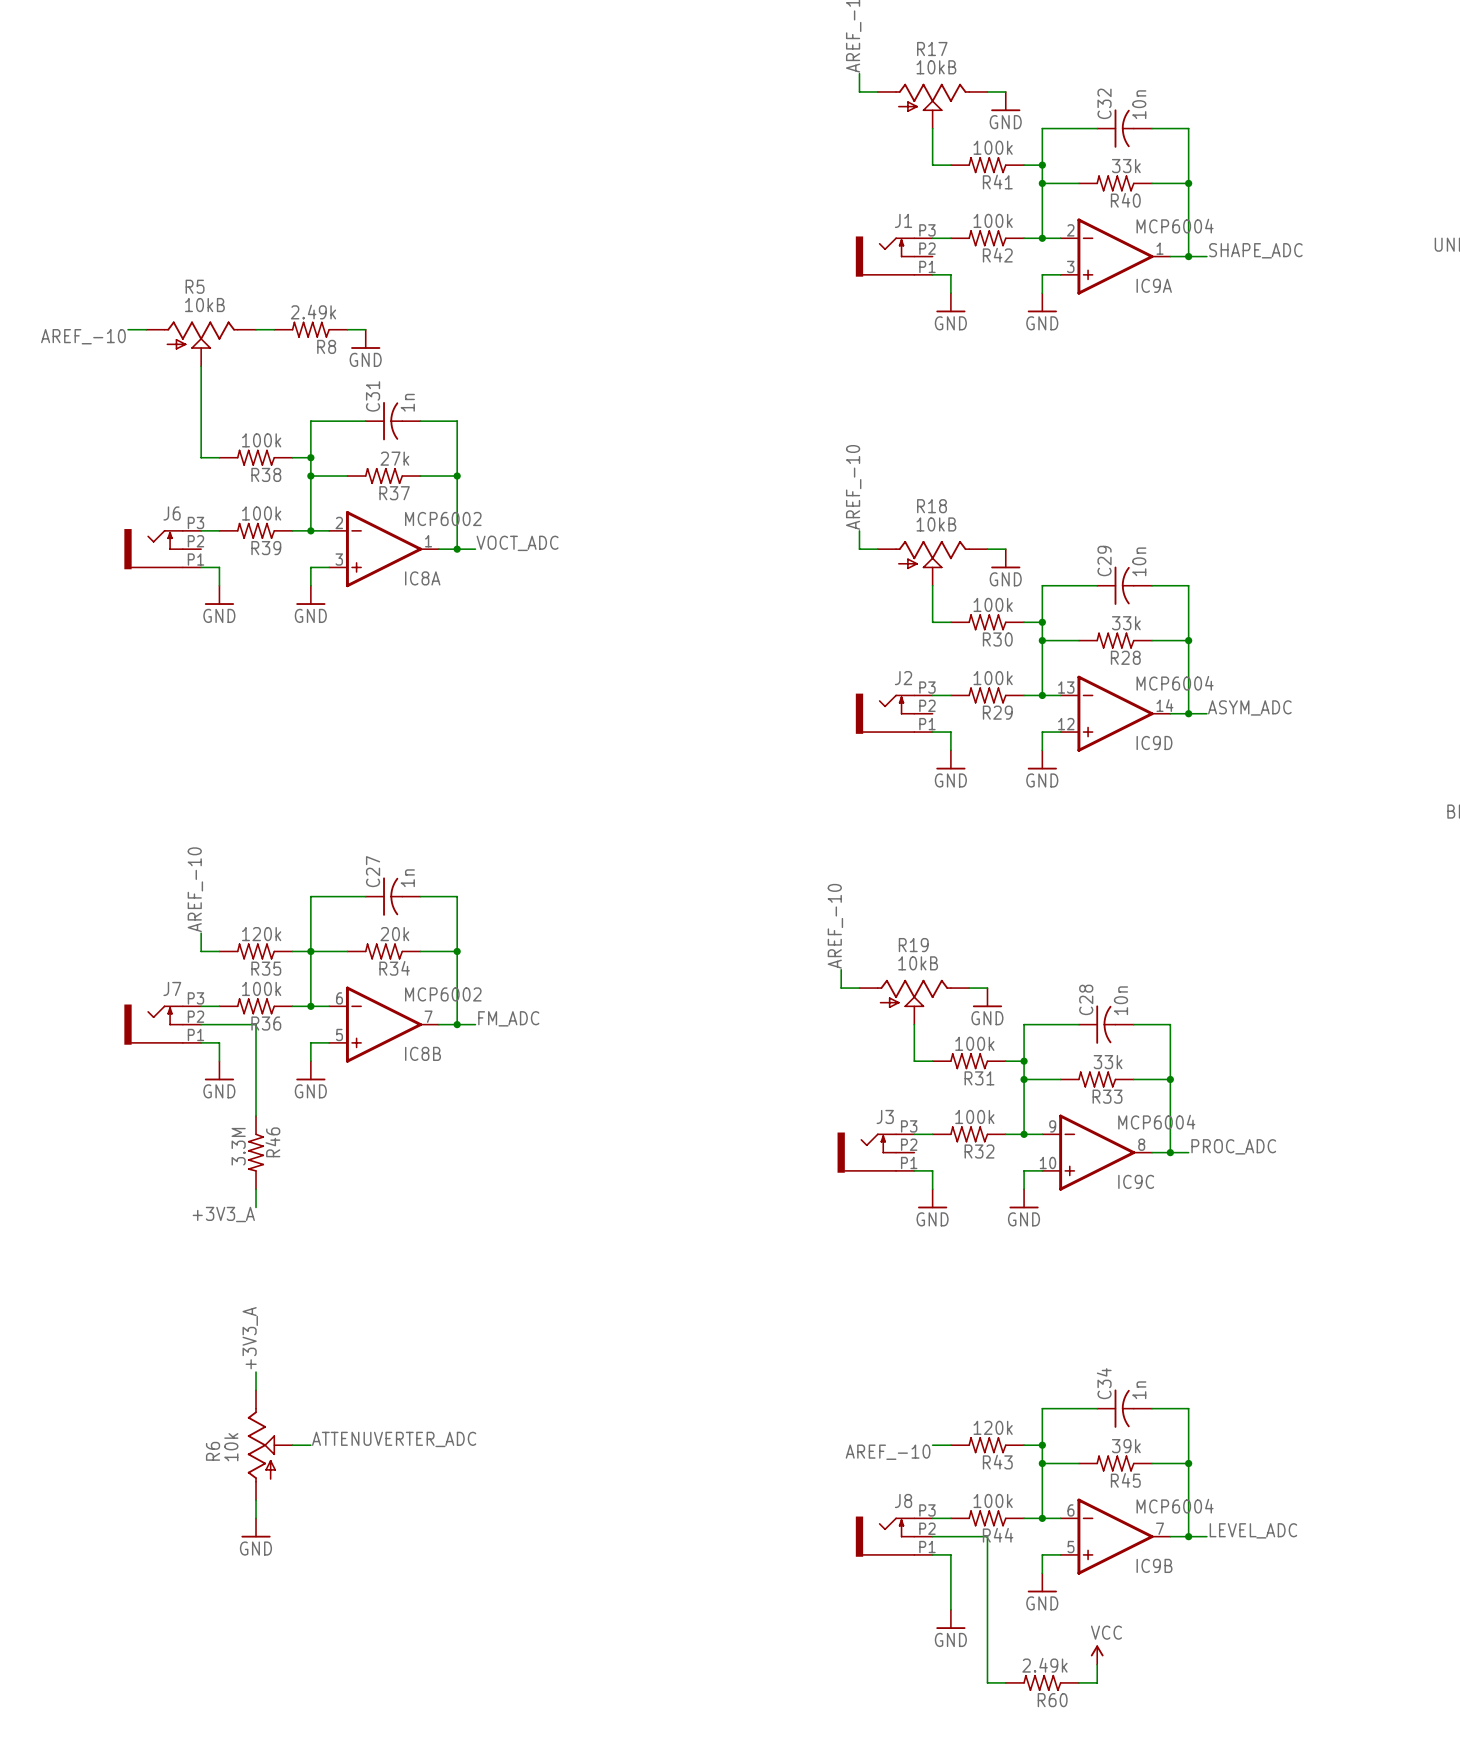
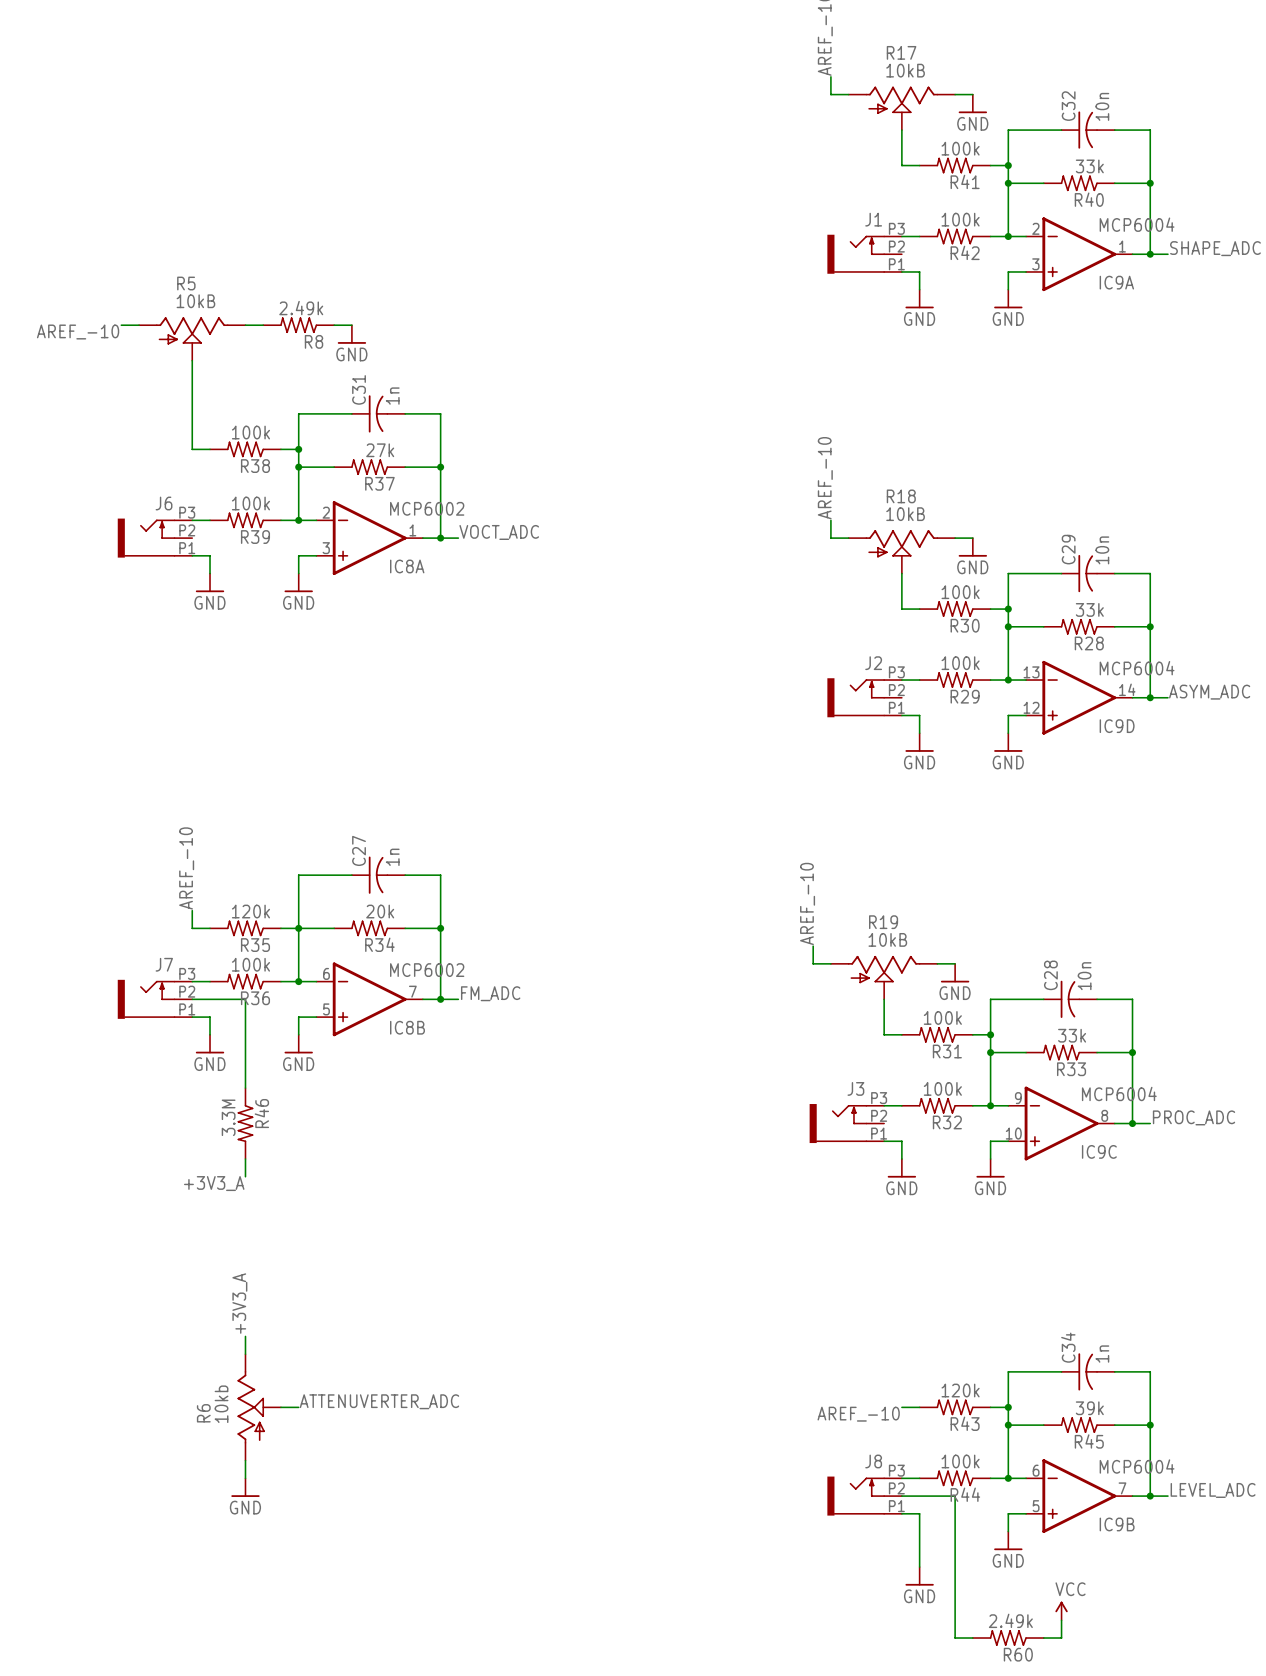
R6 value: 10k (231, 1447) -> 10kb (221, 1404)

